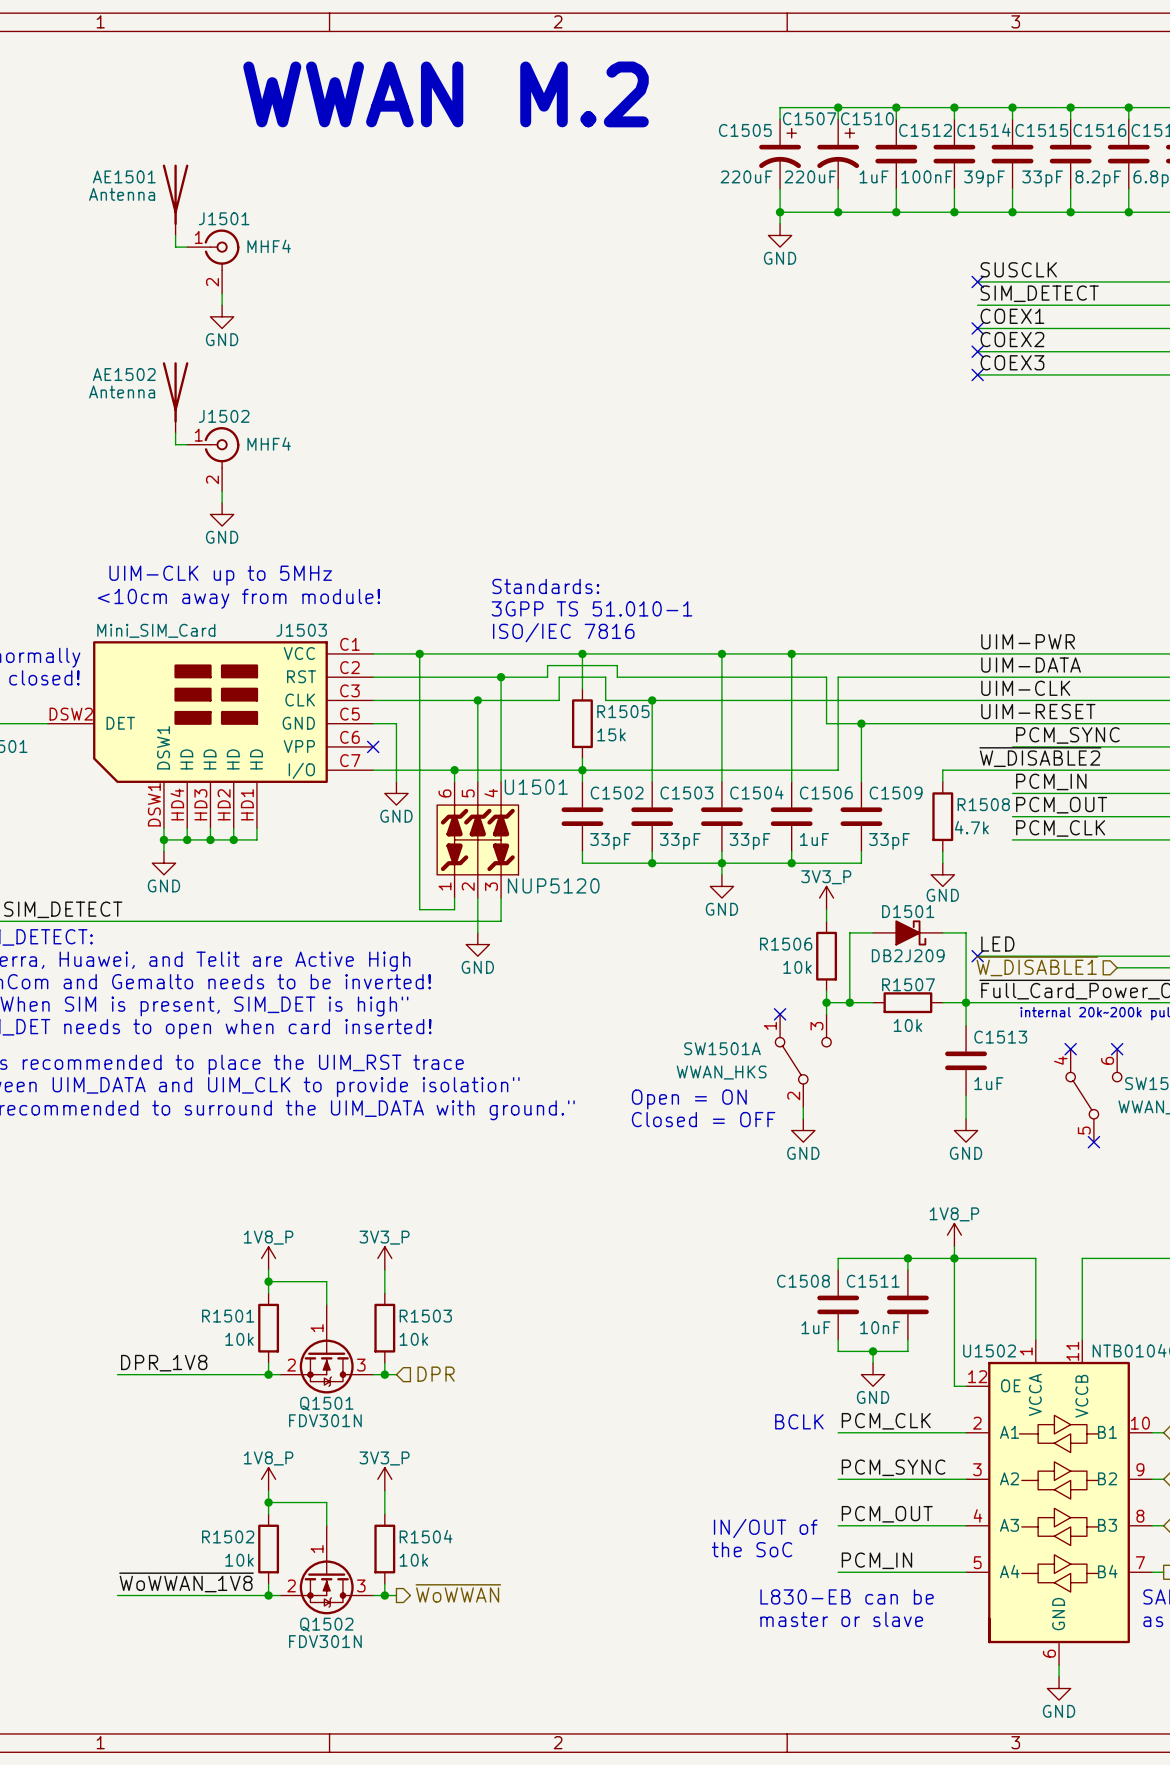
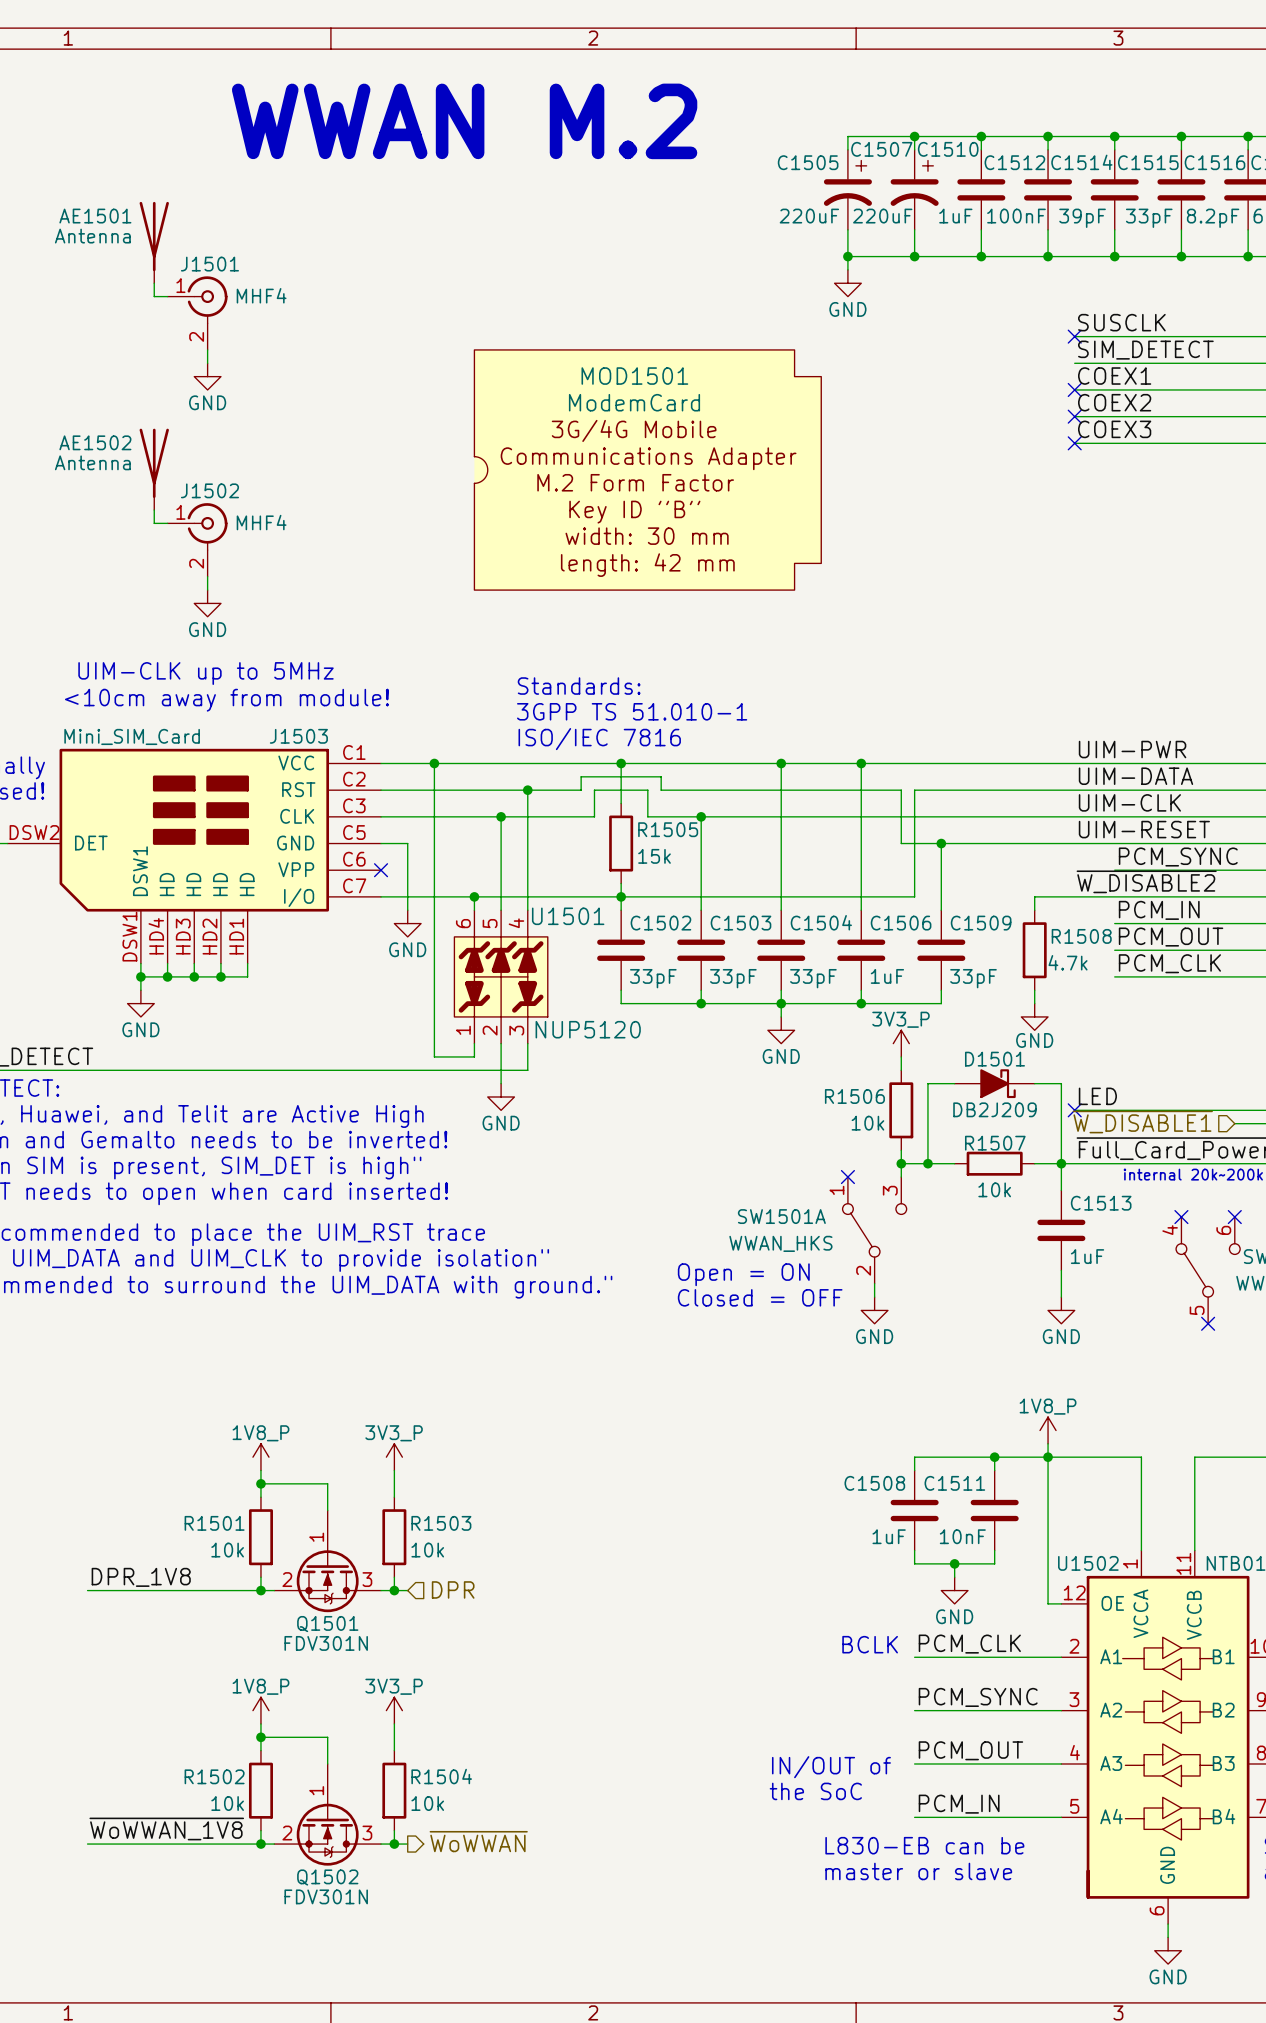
MOD1501: none -> ModemCard (647, 470)

